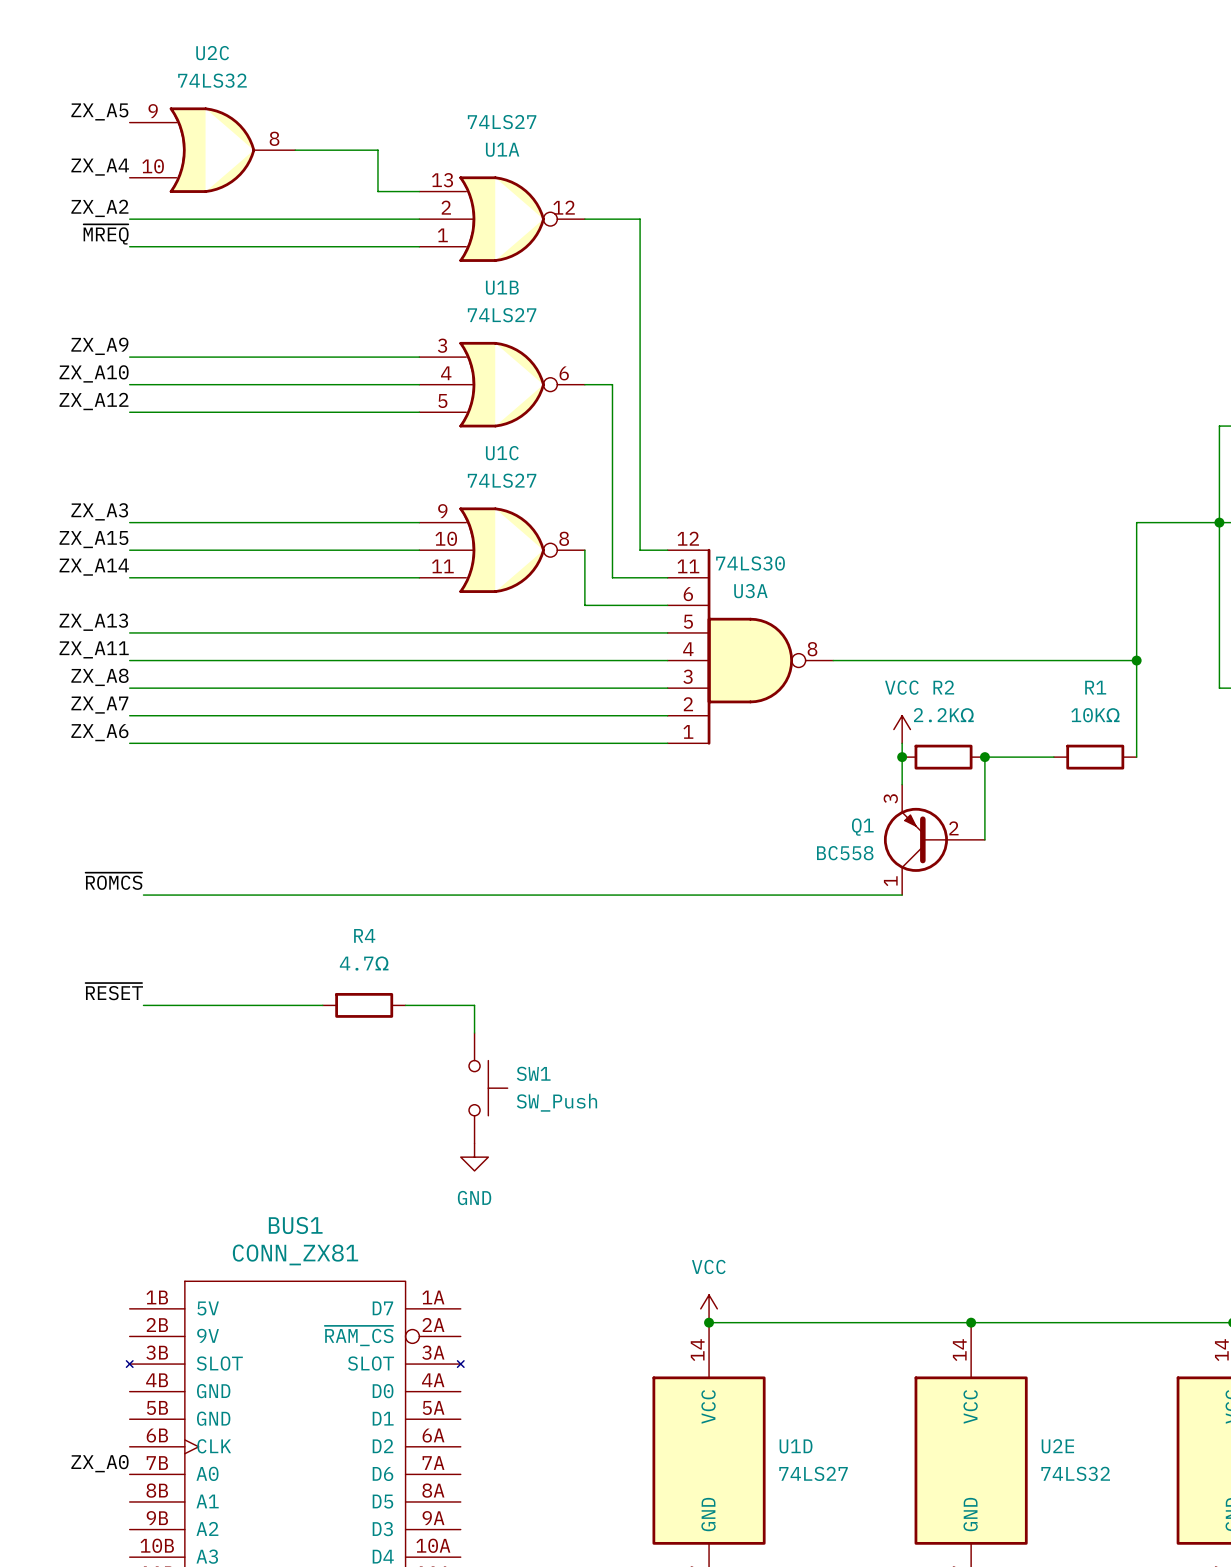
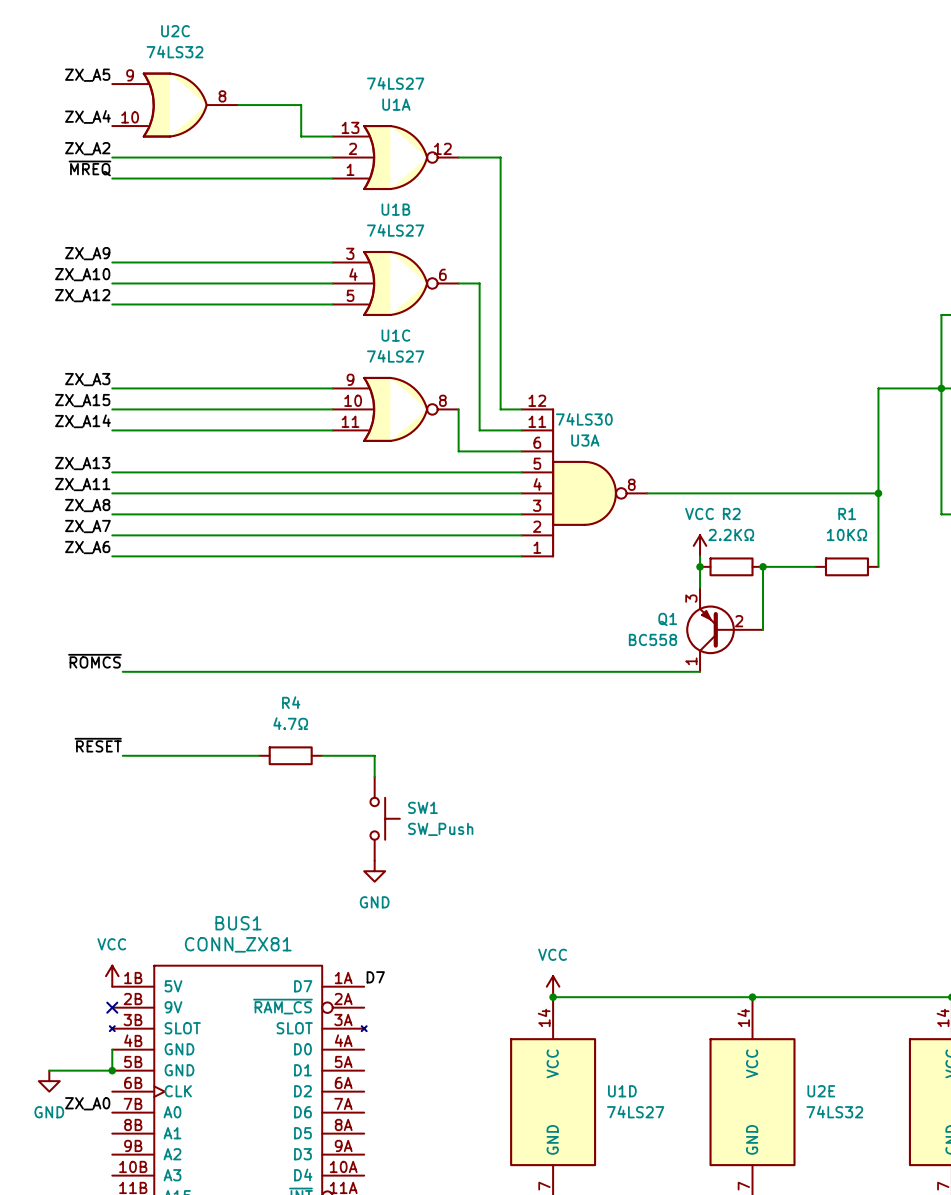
power symbol: none -> VCC (112, 976)
label: none -> D7 (375, 977)
no-connect mark: none -> (112, 1007)
wire: none -> (112, 1049) (112, 1070) (49, 1070)
junction: none -> (112, 1070)
power symbol: none -> GND (49, 1081)

